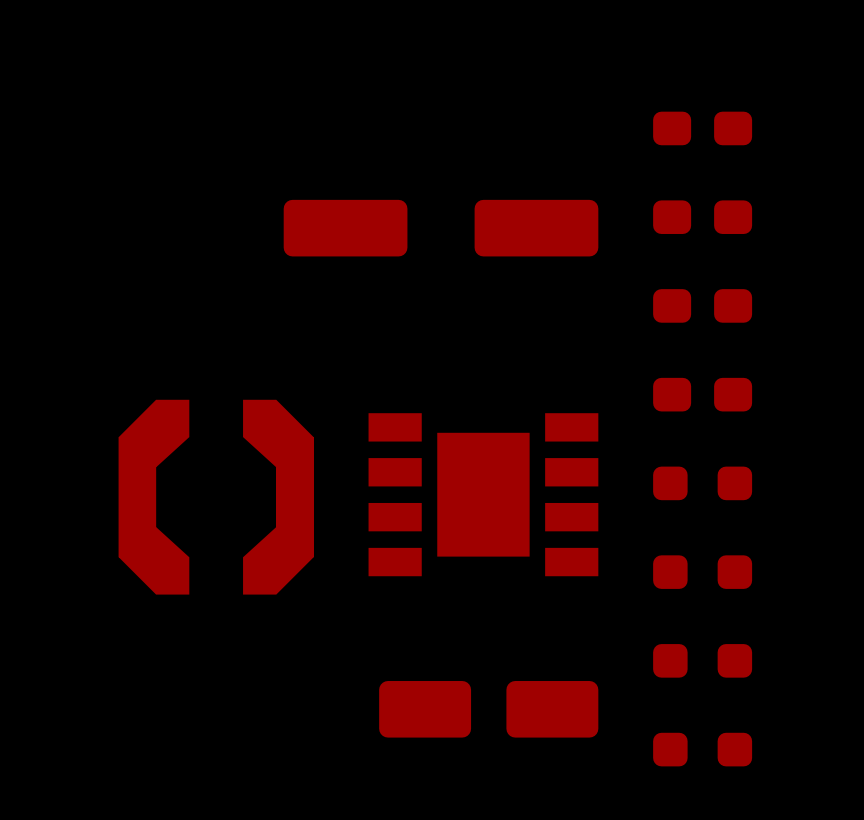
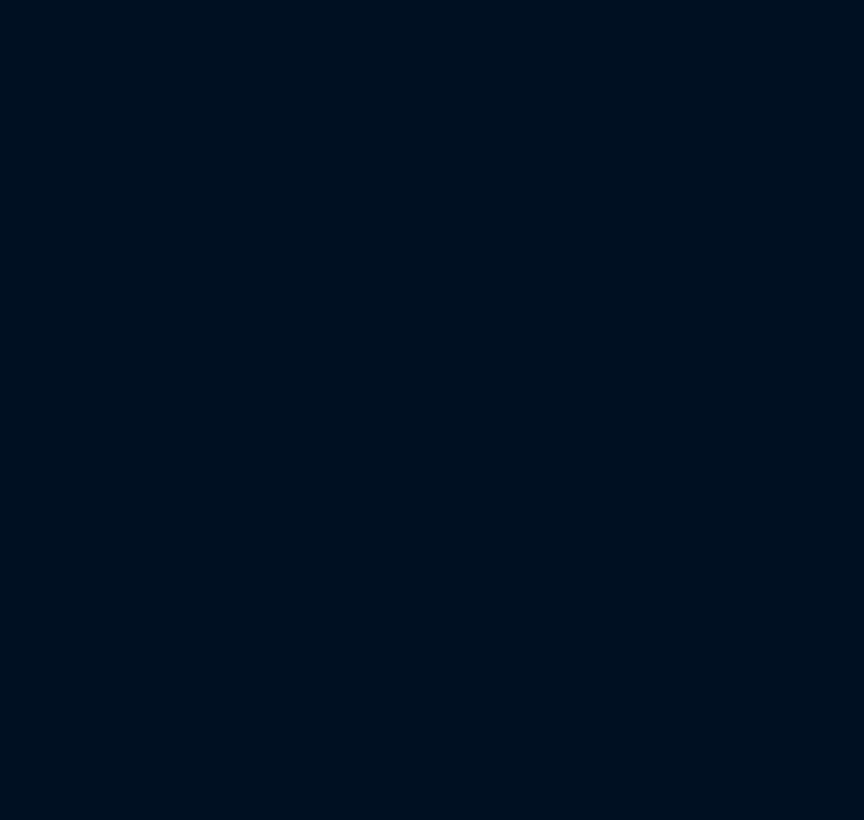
part: (702, 128) -> none
part: (702, 217) -> none
part: (441, 228) -> none
part: (702, 305) -> none
part: (702, 394) -> none
part: (702, 483) -> none
part: (483, 494) -> none
part: (216, 497) -> none
part: (702, 572) -> none
part: (702, 660) -> none
part: (488, 709) -> none
part: (702, 749) -> none

